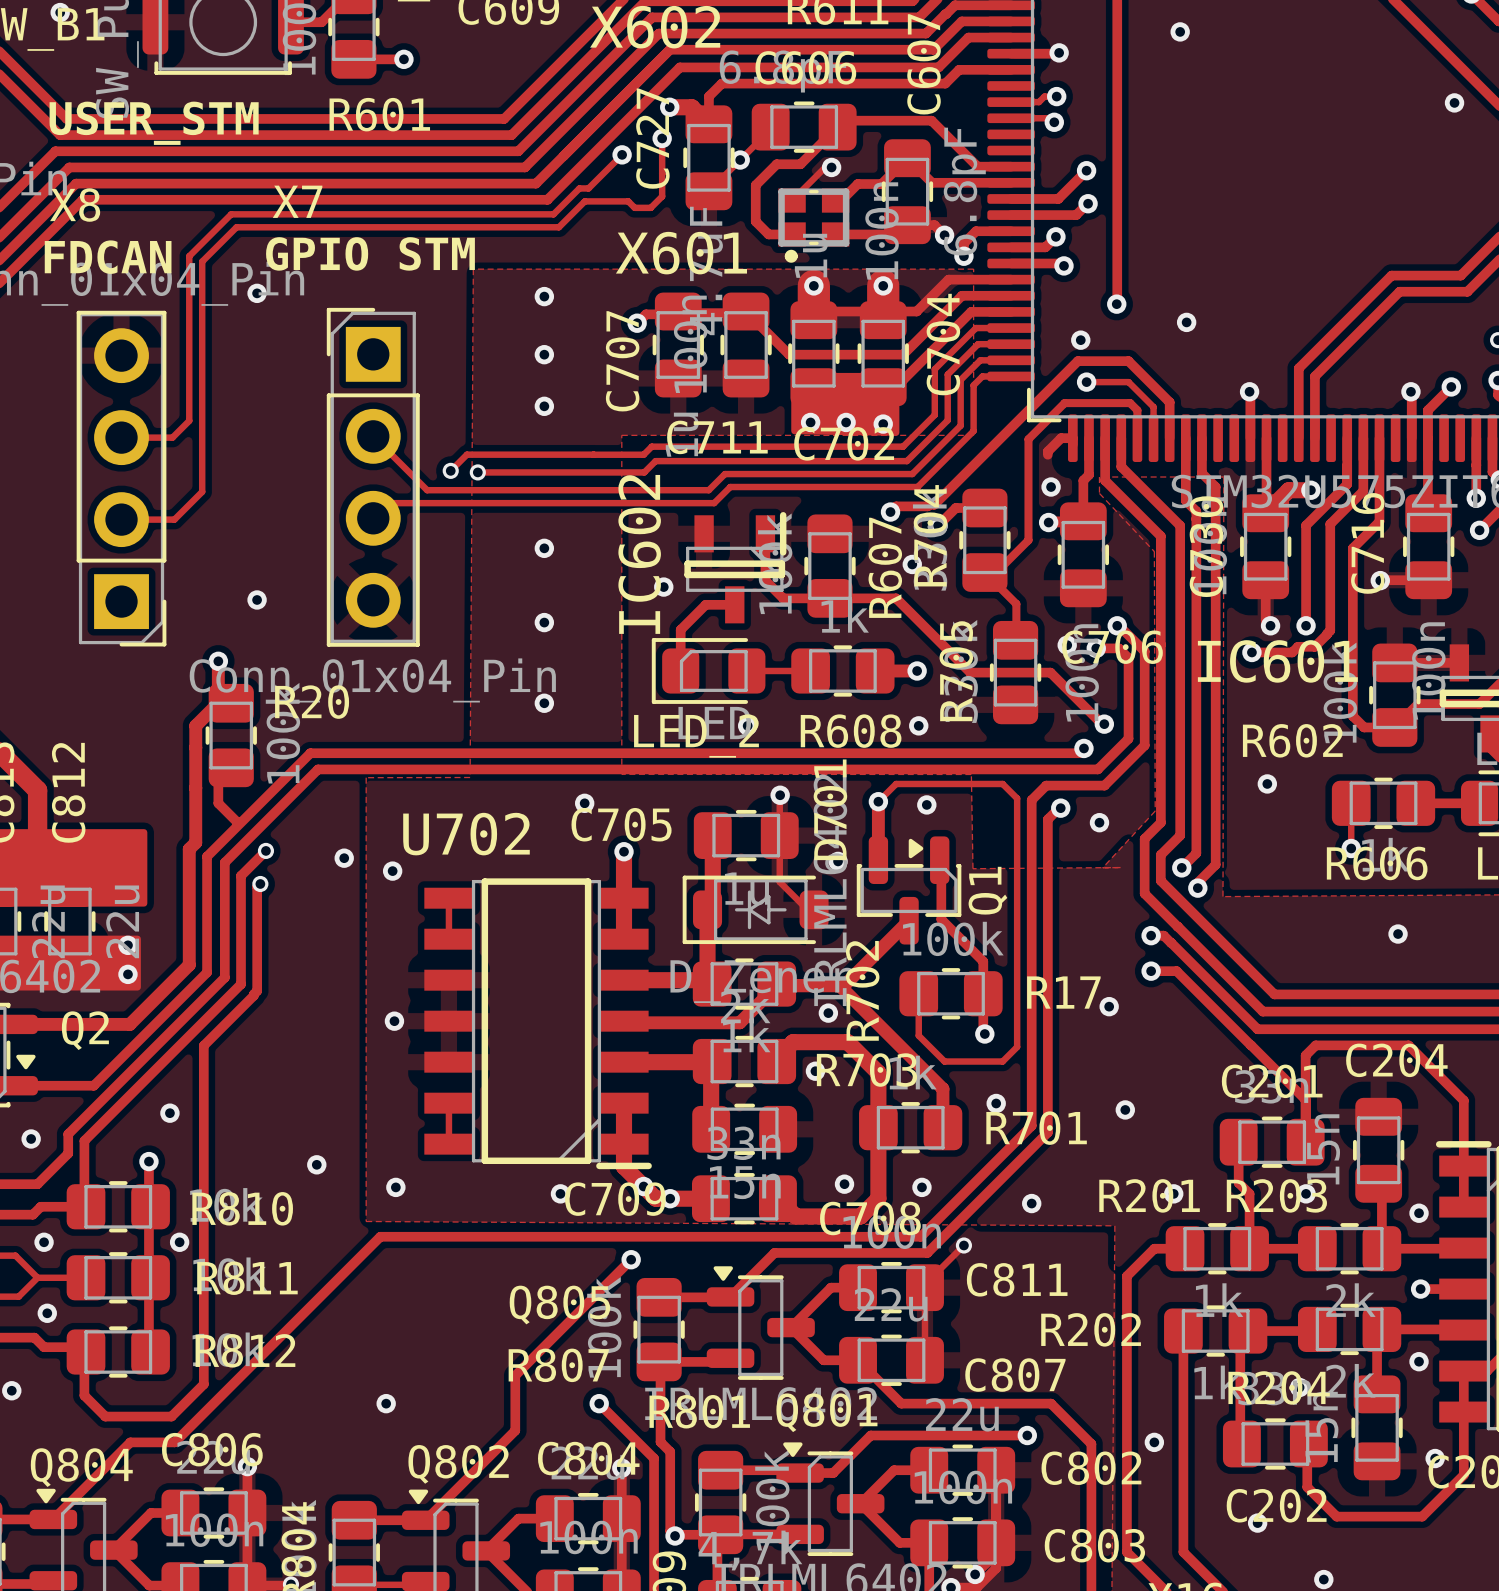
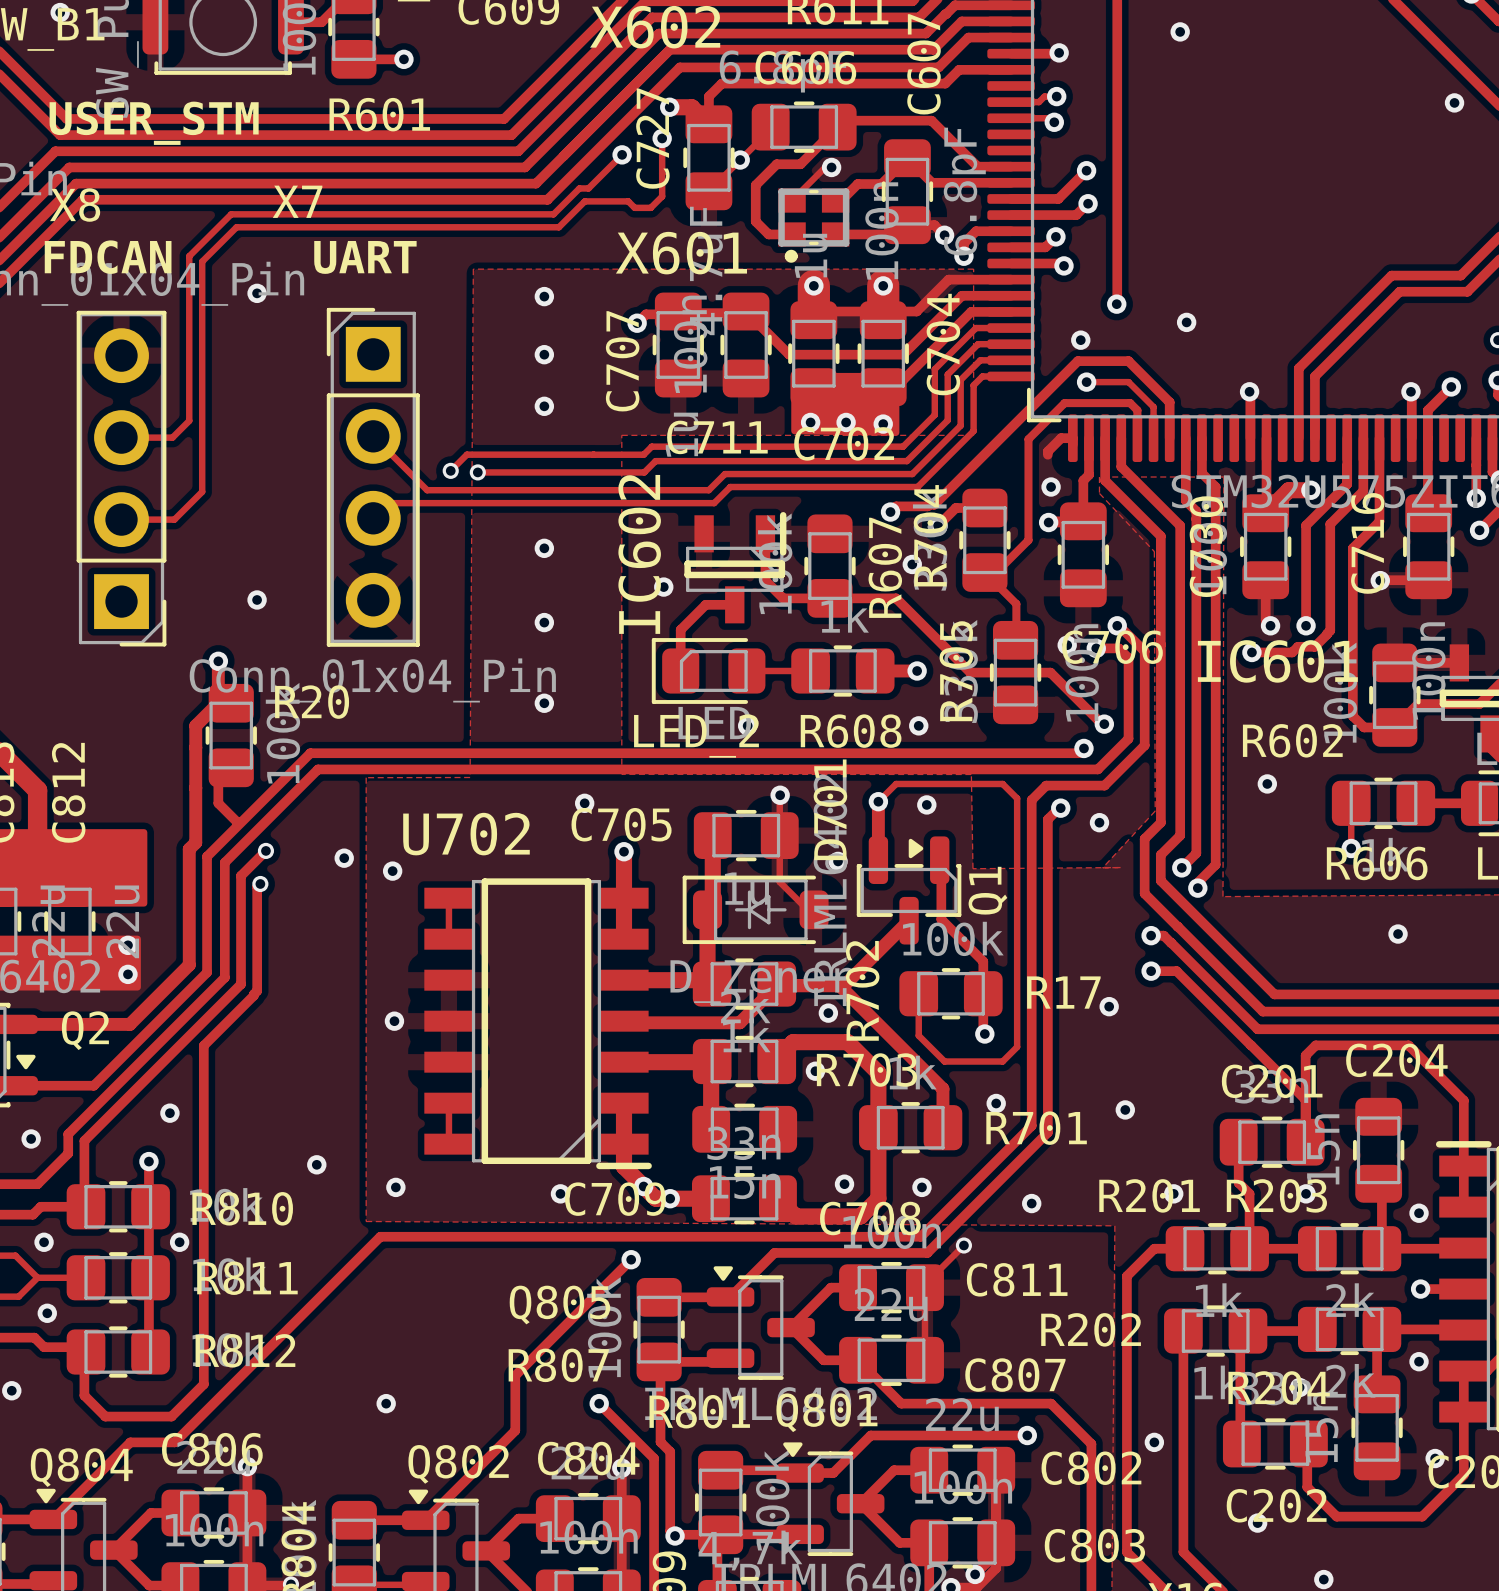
text: GPIO STM (370, 253) -> none
text: none -> UART (365, 257)

